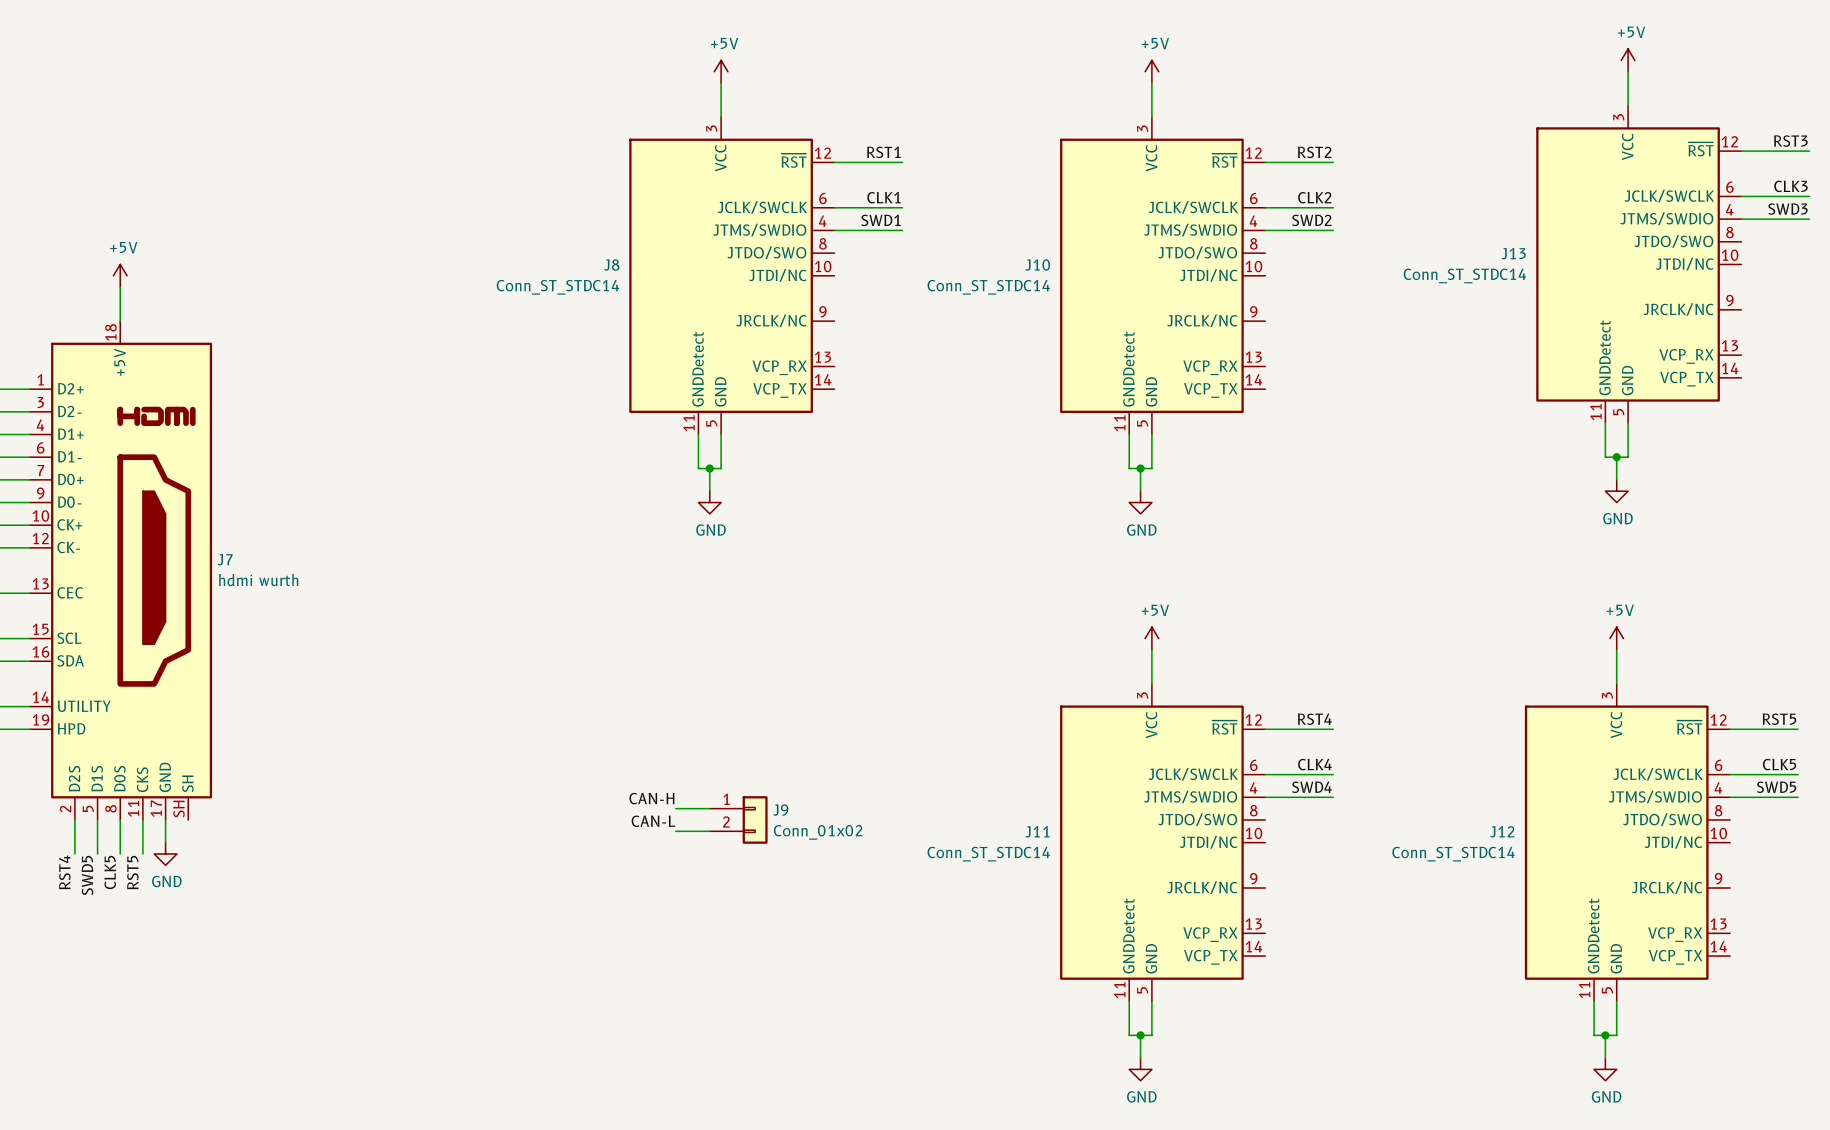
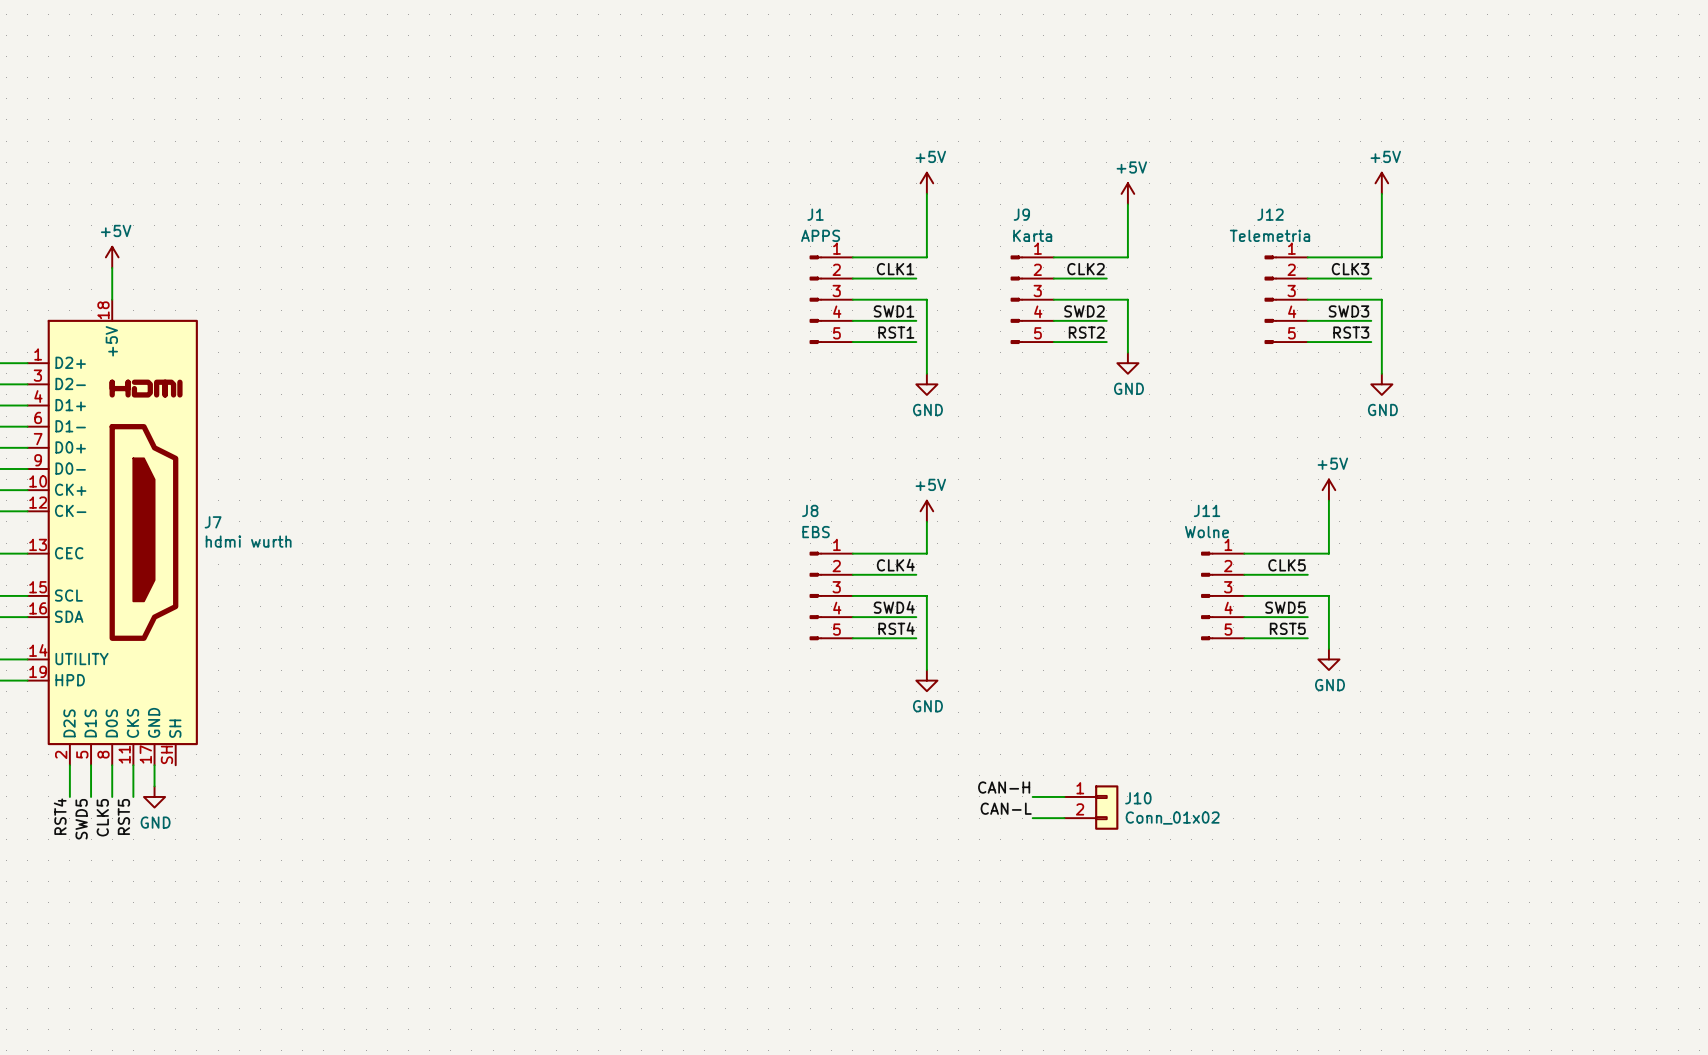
power symbol: +5V (1628, 60) -> none
power symbol: +5V (721, 71) -> none
power symbol: +5V (1151, 71) -> none
wire: (1628, 71) (1628, 105) -> none
wire: (721, 83) (721, 117) -> none
wire: (1151, 83) (1151, 117) -> none
J8 symbol: [629, 117, 835, 435] -> [809, 551, 853, 640]
J10 symbol: [1060, 117, 1266, 435] -> [1064, 785, 1119, 830]
label: RST3 (1790, 141) -> none
wire: (1741, 151) (1809, 151) -> none
label position: RST1 (883, 152) -> RST1 (896, 332)
label: RST2 (1314, 152) -> none
wire: (834, 162) (902, 162) -> (852, 278) (916, 278)
wire: (1265, 162) (1333, 162) -> (1307, 278) (1371, 278)
label: CLK3 (1790, 186) -> none
power symbol: none -> +5V (926, 183)
power symbol: none -> +5V (1381, 183)
wire: (1741, 196) (1809, 196) -> none
label position: CLK1 (883, 197) -> CLK1 (895, 269)
label position: CLK2 (1314, 197) -> CLK2 (1086, 269)
wire: (834, 207) (902, 207) -> (852, 320) (916, 320)
wire: none -> (926, 193) (926, 257) (852, 257)
power symbol: none -> +5V (1127, 193)
wire: (1265, 207) (1333, 207) -> (1307, 320) (1371, 320)
wire: none -> (1381, 193) (1381, 257) (1307, 257)
label: SWD3 (1787, 209) -> none
wire: (1741, 219) (1809, 219) -> none
label position: SWD1 (880, 220) -> SWD1 (894, 311)
label position: SWD2 (1311, 220) -> SWD2 (1084, 311)
wire: (834, 230) (902, 230) -> (852, 342) (916, 342)
wire: (1265, 230) (1333, 230) -> (1307, 342) (1371, 342)
J13: Conn_ST_STDC14 (1638, 264) -> none
J8 name position: J8 (611, 265) -> J8 (810, 510)
J10 name position: J10 (1037, 265) -> J10 (1138, 798)
J8 value: Conn_ST_STDC14 (557, 287) -> EBS (816, 532)
J10 value: Conn_ST_STDC14 (988, 287) -> Conn_01x02 (1172, 818)
label: none -> CLK3 (1350, 269)
J1: none -> APPS (831, 299)
wire: none -> (852, 299) (926, 299) (926, 373)
wire: none -> (1307, 299) (1381, 299) (1381, 373)
label: none -> SWD3 (1349, 311)
label: none -> RST2 (1086, 332)
label: none -> RST3 (1351, 332)
power symbol: none -> GND (1127, 363)
power symbol: none -> GND (926, 384)
power symbol: none -> GND (1381, 384)
wire: (1605, 423) (1605, 457) (1628, 457) (1628, 423) -> none
wire: (698, 434) (698, 468) (721, 468) (721, 434) -> none
wire: (1129, 434) (1129, 468) (1151, 468) (1151, 434) -> none
wire: (1616, 457) (1616, 479) -> none
junction: (1616, 457) -> none
wire: (709, 468) (709, 491) -> none
junction: (709, 468) -> none
wire: (1140, 468) (1140, 491) -> none
junction: (1140, 468) -> none
power symbol: GND (1616, 491) -> none
power symbol: GND (709, 502) -> none
power symbol: GND (1140, 502) -> none
power symbol: none -> +5V (1328, 490)
wire: none -> (1328, 500) (1328, 553) (1244, 553)
power symbol: none -> +5V (926, 511)
wire: none -> (926, 521) (926, 553) (852, 553)
label: none -> CLK4 (895, 565)
label: none -> CLK5 (1287, 565)
wire: none -> (852, 574) (916, 574)
wire: none -> (852, 595) (926, 595) (926, 670)
power symbol: +5V (1151, 638) -> none
wire: none -> (1244, 595) (1328, 595) (1328, 648)
power symbol: +5V (1616, 638) -> none
wire: (1151, 649) (1151, 683) -> none
wire: (1616, 649) (1616, 683) -> none
label: none -> SWD4 (894, 607)
label: none -> SWD5 (1285, 607)
wire: none -> (852, 617) (916, 617)
label: none -> RST4 (896, 628)
label: none -> RST5 (1287, 628)
wire: none -> (852, 638) (916, 638)
J11 symbol: [1060, 683, 1266, 1002] -> [1201, 551, 1245, 640]
J12 symbol: [1524, 683, 1731, 1002] -> [1264, 255, 1308, 344]
power symbol: none -> GND (1328, 659)
label: RST4 (1314, 719) -> none
label: RST5 (1779, 719) -> none
power symbol: none -> GND (926, 680)
wire: (1265, 729) (1333, 729) -> (1244, 574) (1307, 574)
wire: (1730, 729) (1798, 729) -> none
label: CLK4 (1314, 764) -> none
label: CLK5 (1779, 764) -> none
wire: (1265, 774) (1333, 774) -> (1244, 617) (1307, 617)
wire: (1730, 774) (1798, 774) -> none
label: SWD4 (1311, 787) -> none
label: SWD5 (1776, 787) -> none
J9 symbol: [709, 796, 768, 844] -> [1010, 255, 1054, 344]
wire: (1265, 797) (1333, 797) -> (1244, 638) (1307, 638)
wire: (1730, 797) (1798, 797) -> none
label: CAN-H (651, 798) -> none
wire: (675, 808) (709, 808) -> none
J9 name position: J9 (780, 810) -> J9 (1021, 214)
label: CAN-L (653, 821) -> none
wire: (675, 831) (709, 831) -> none
J11 name position: J11 (1037, 831) -> J11 (1207, 510)
J12 name position: J12 (1502, 831) -> J12 (1270, 214)
J9 value: Conn_01x02 (818, 832) -> Karta (1032, 235)
label: none -> CAN-H (1004, 787)
J11 value: Conn_ST_STDC14 (988, 854) -> Wolne (1207, 532)
J12 value: Conn_ST_STDC14 (1453, 854) -> Telemetria (1269, 235)
label: none -> CAN-L (1006, 808)
wire: (1129, 1001) (1129, 1035) (1151, 1035) (1151, 1001) -> none
wire: (1594, 1001) (1594, 1035) (1616, 1035) (1616, 1001) -> none
wire: (1140, 1035) (1140, 1058) -> none
junction: (1140, 1035) -> none
wire: (1605, 1035) (1605, 1058) -> none
junction: (1605, 1035) -> none
power symbol: GND (1140, 1069) -> none
power symbol: GND (1605, 1069) -> none

